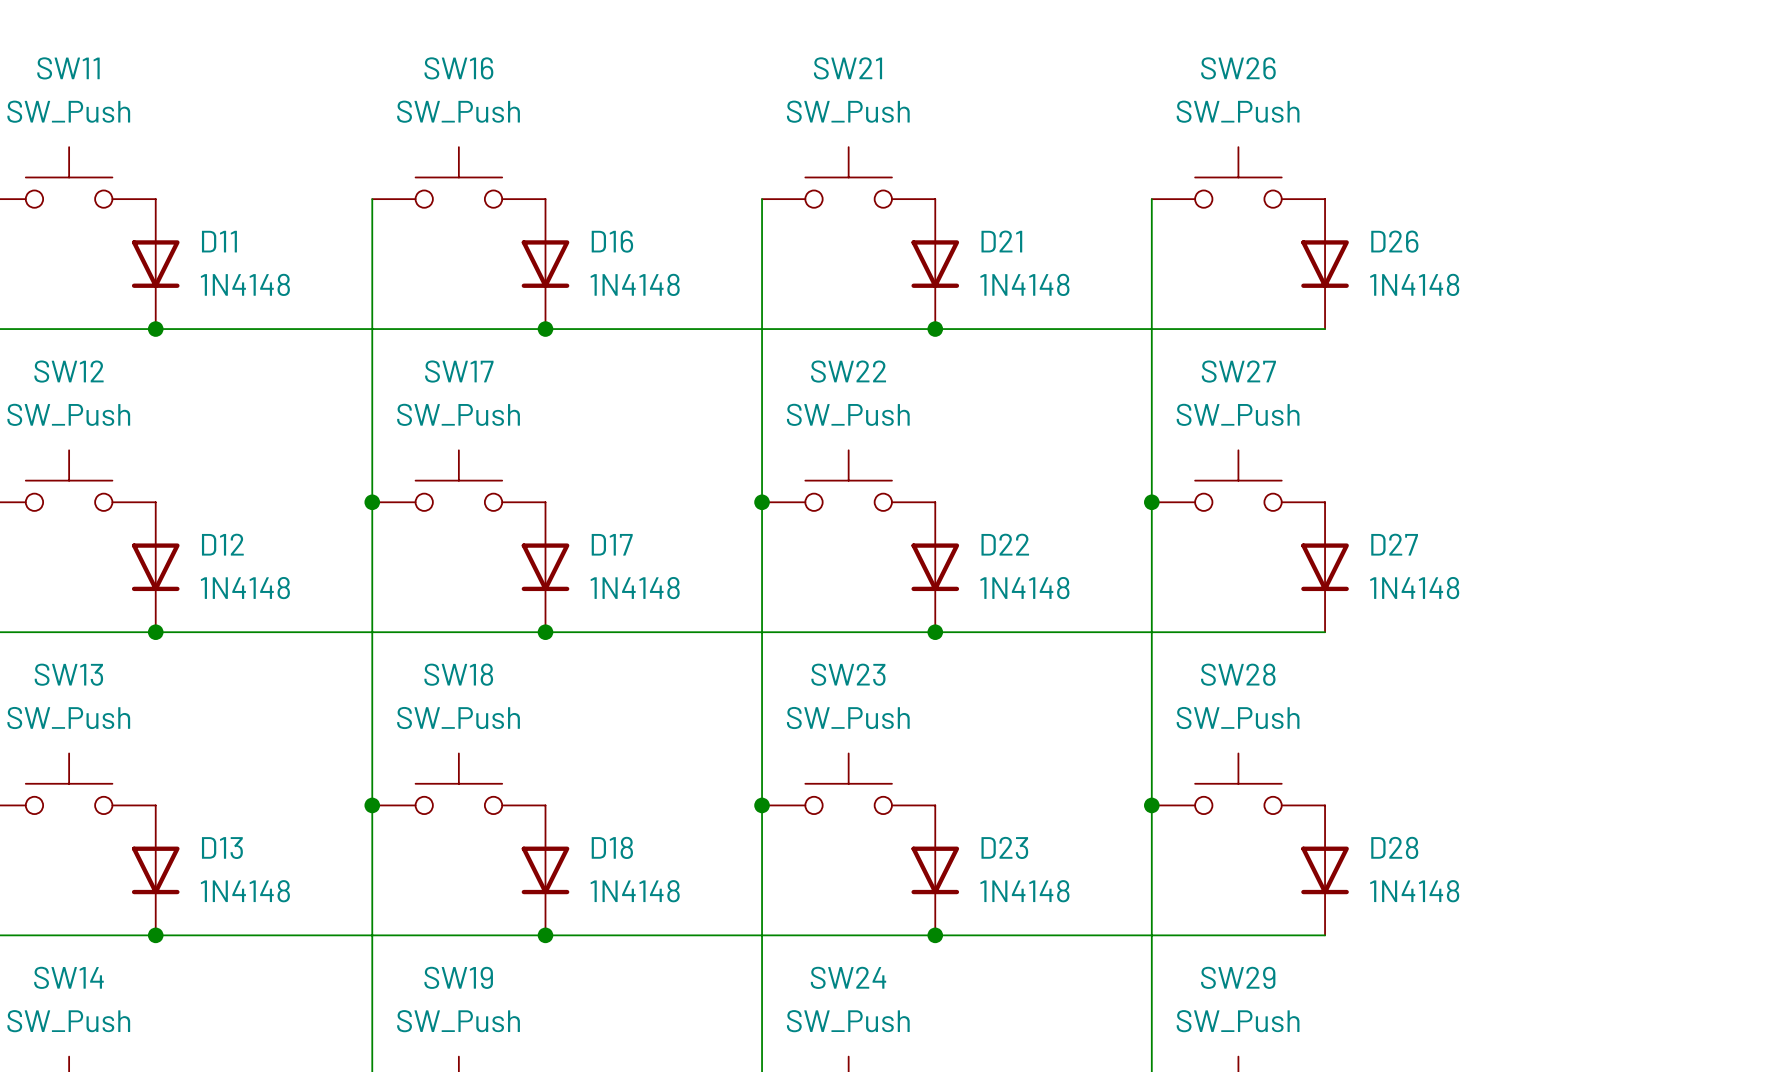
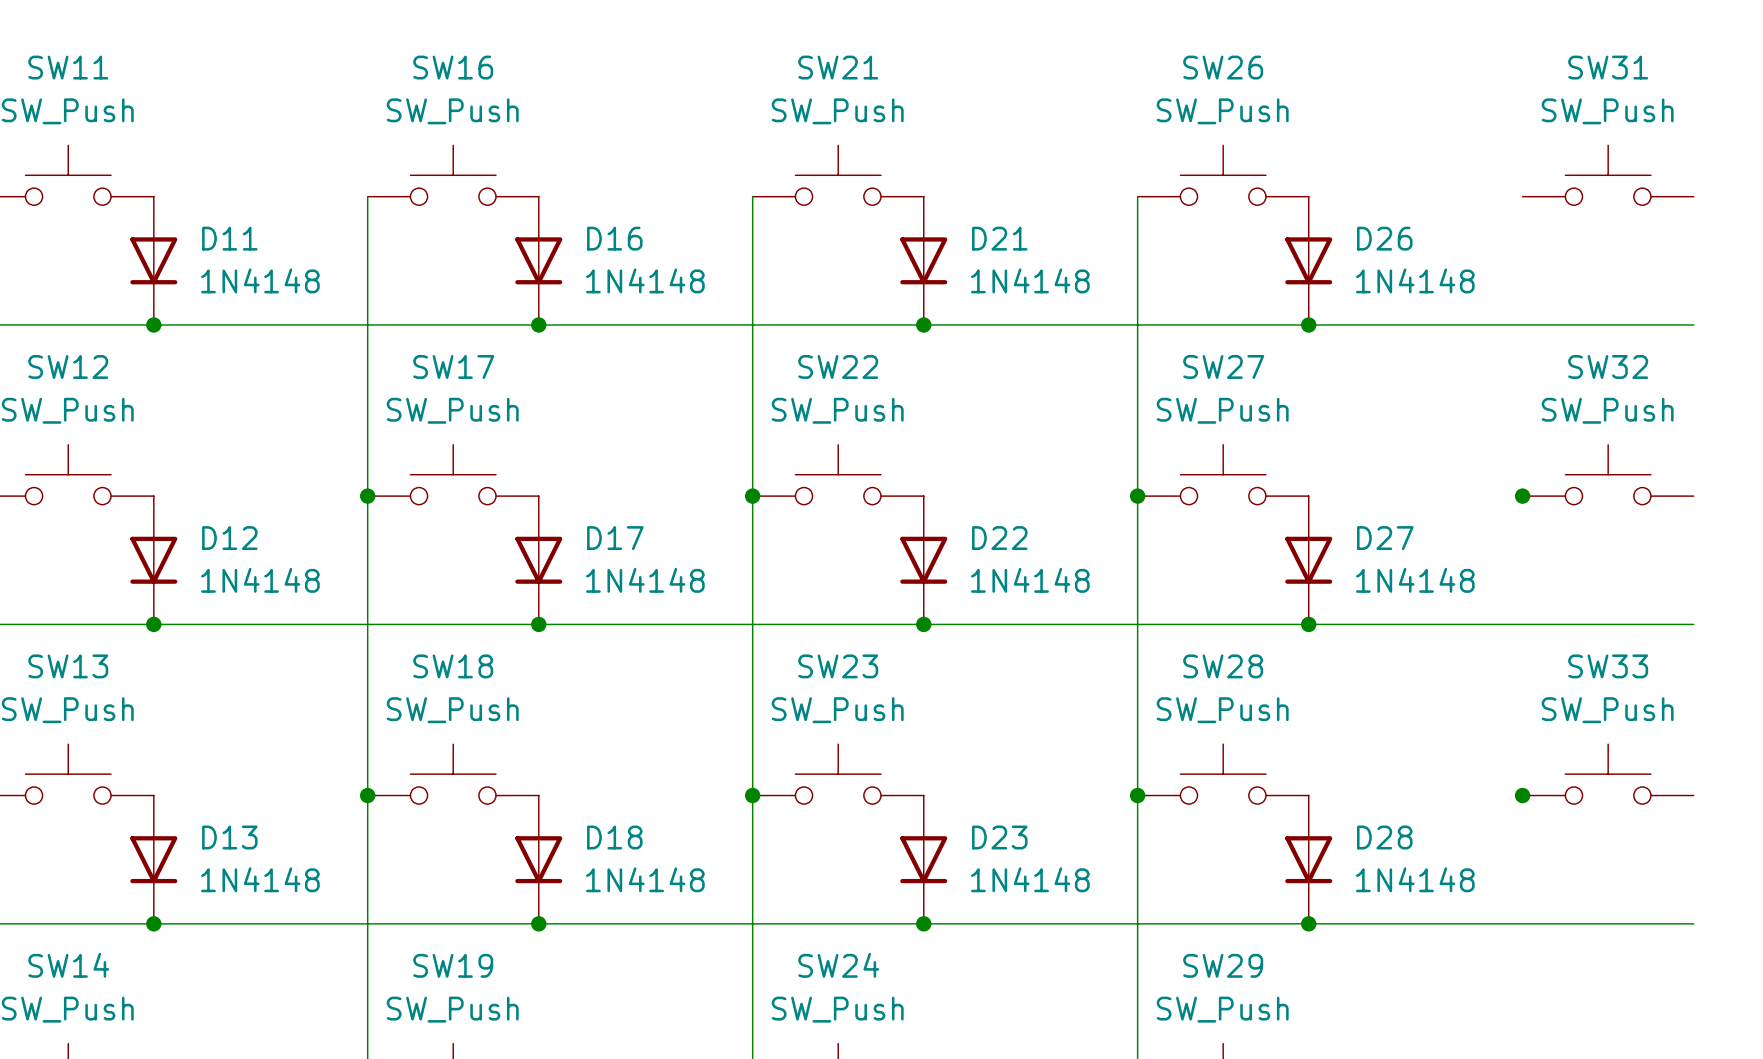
SW31: none -> SW_Push (1608, 175)
wire: none -> (1308, 325) (1693, 325)
junction: none -> (1308, 325)
SW32: none -> SW_Push (1608, 474)
junction: none -> (1522, 496)
wire: none -> (1308, 624) (1693, 624)
junction: none -> (1308, 624)
SW33: none -> SW_Push (1608, 774)
junction: none -> (1522, 795)
wire: none -> (1308, 923) (1693, 923)
junction: none -> (1308, 923)

